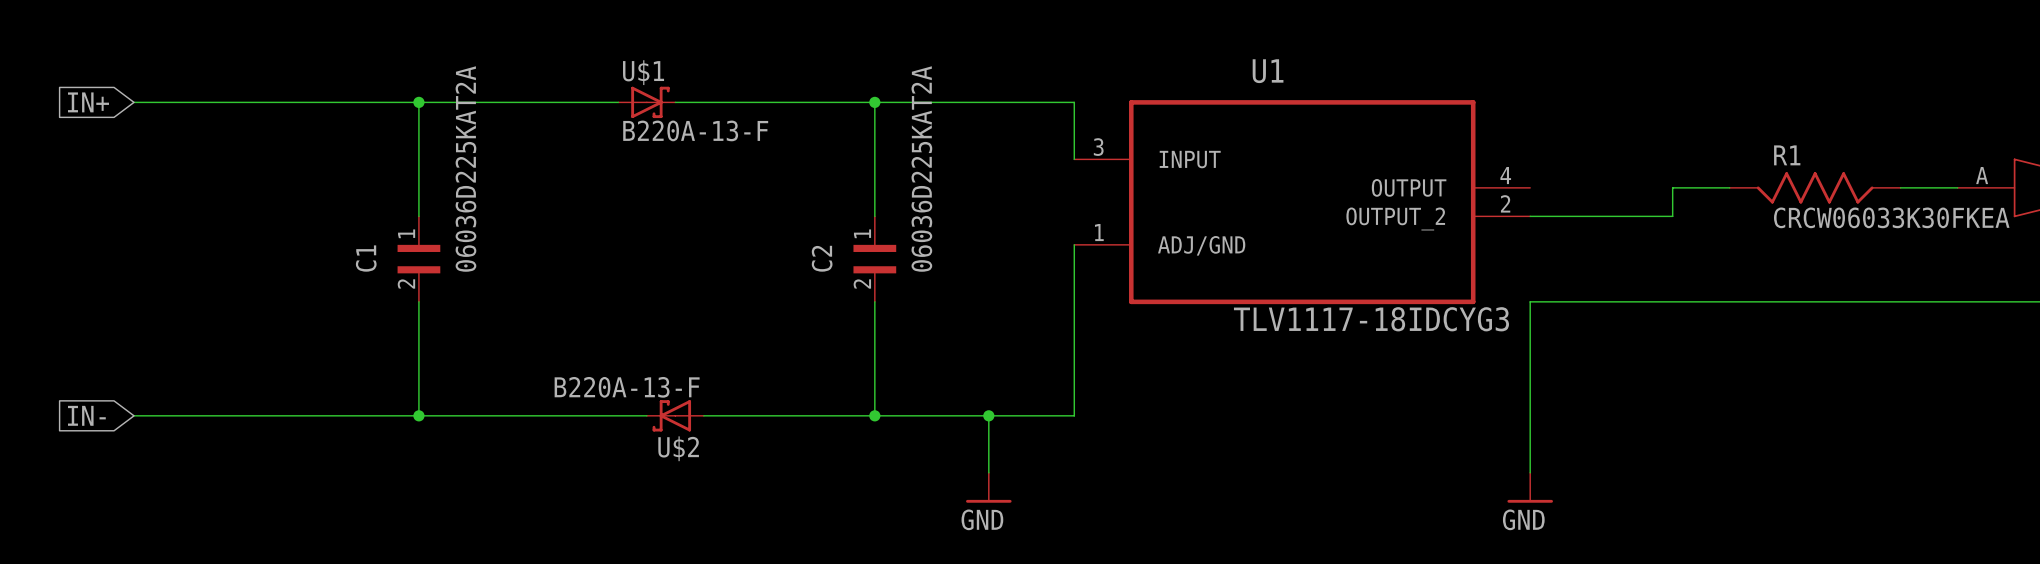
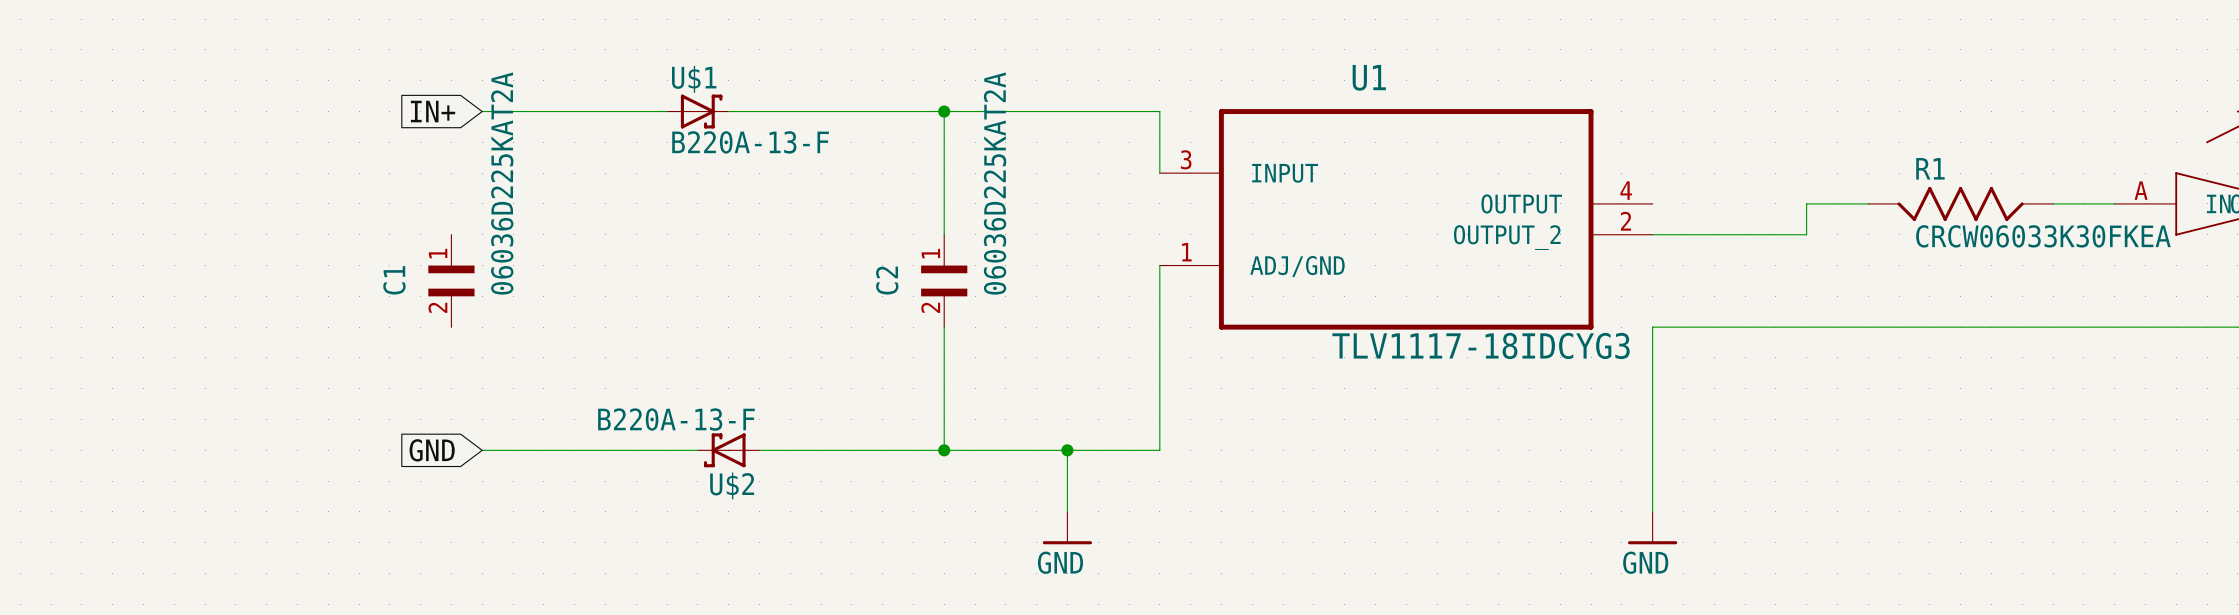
global label: IN+ (88, 102) -> none
wire: (133, 102) (447, 102) -> none
global label: none -> IN+ (433, 111)
wire: (418, 102) (418, 216) -> none
junction: (418, 102) -> none
wire: (418, 301) (418, 415) -> none
global label: IN- (86, 415) -> none
wire: (133, 415) (447, 415) -> none
global label: none -> GND (432, 450)
junction: (418, 415) -> none

